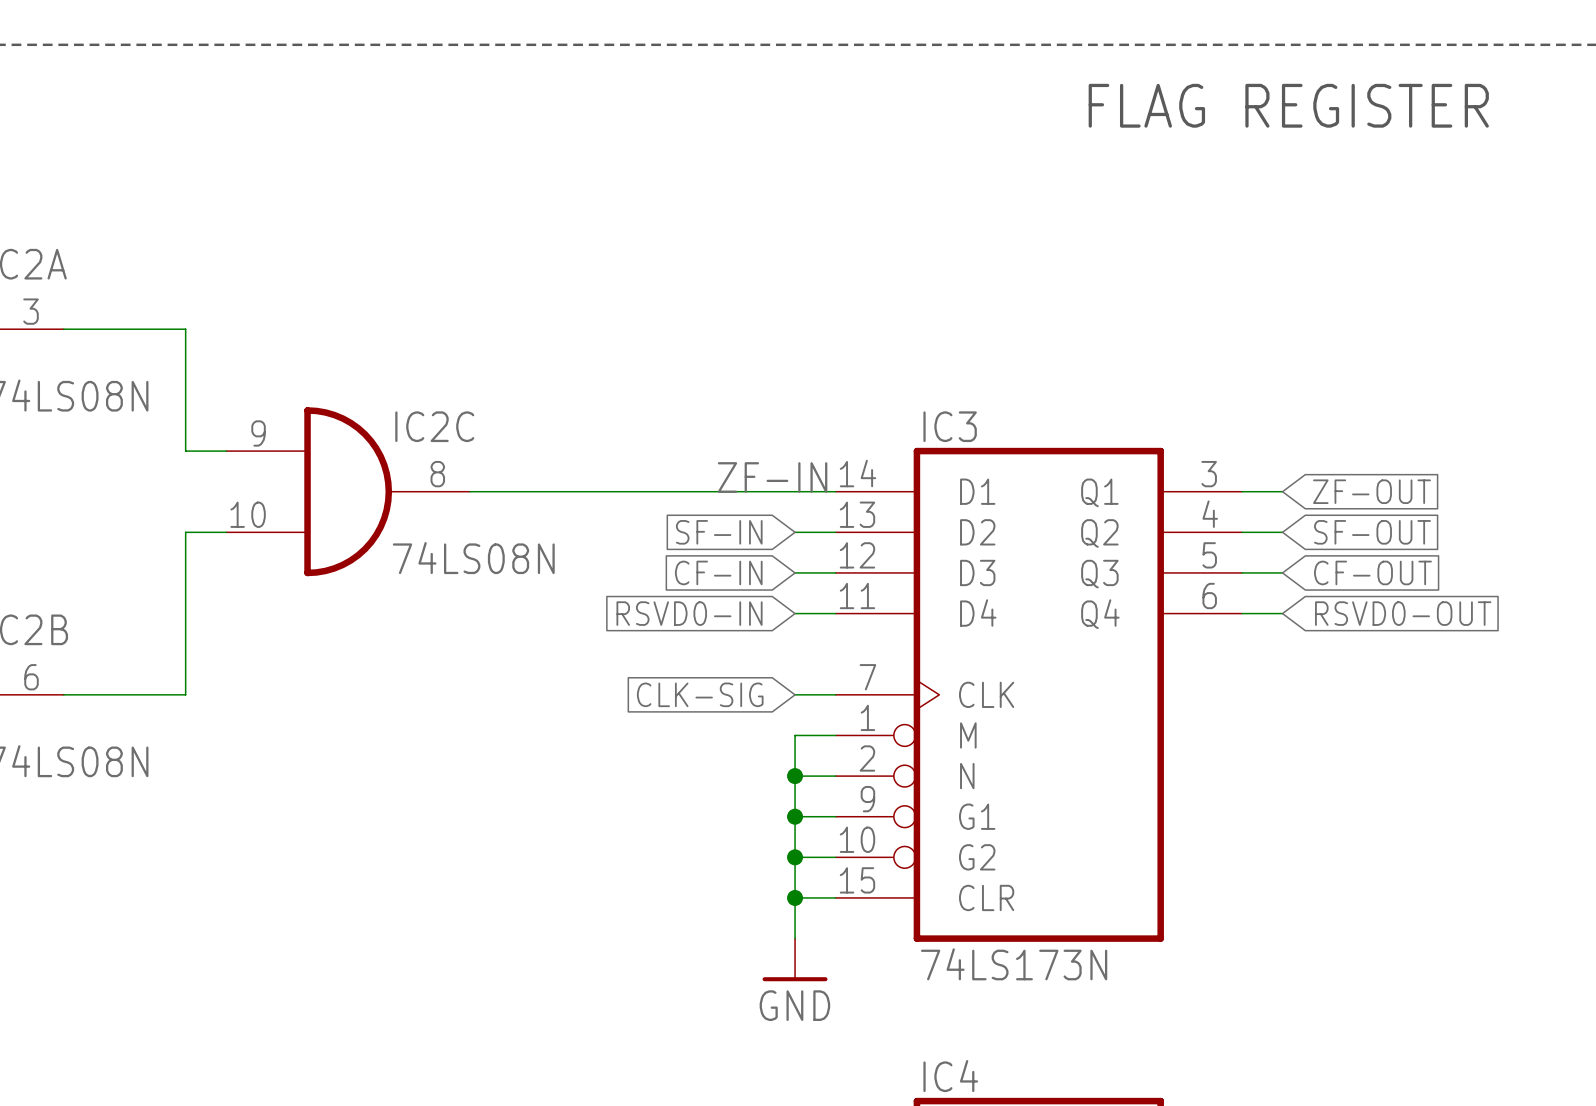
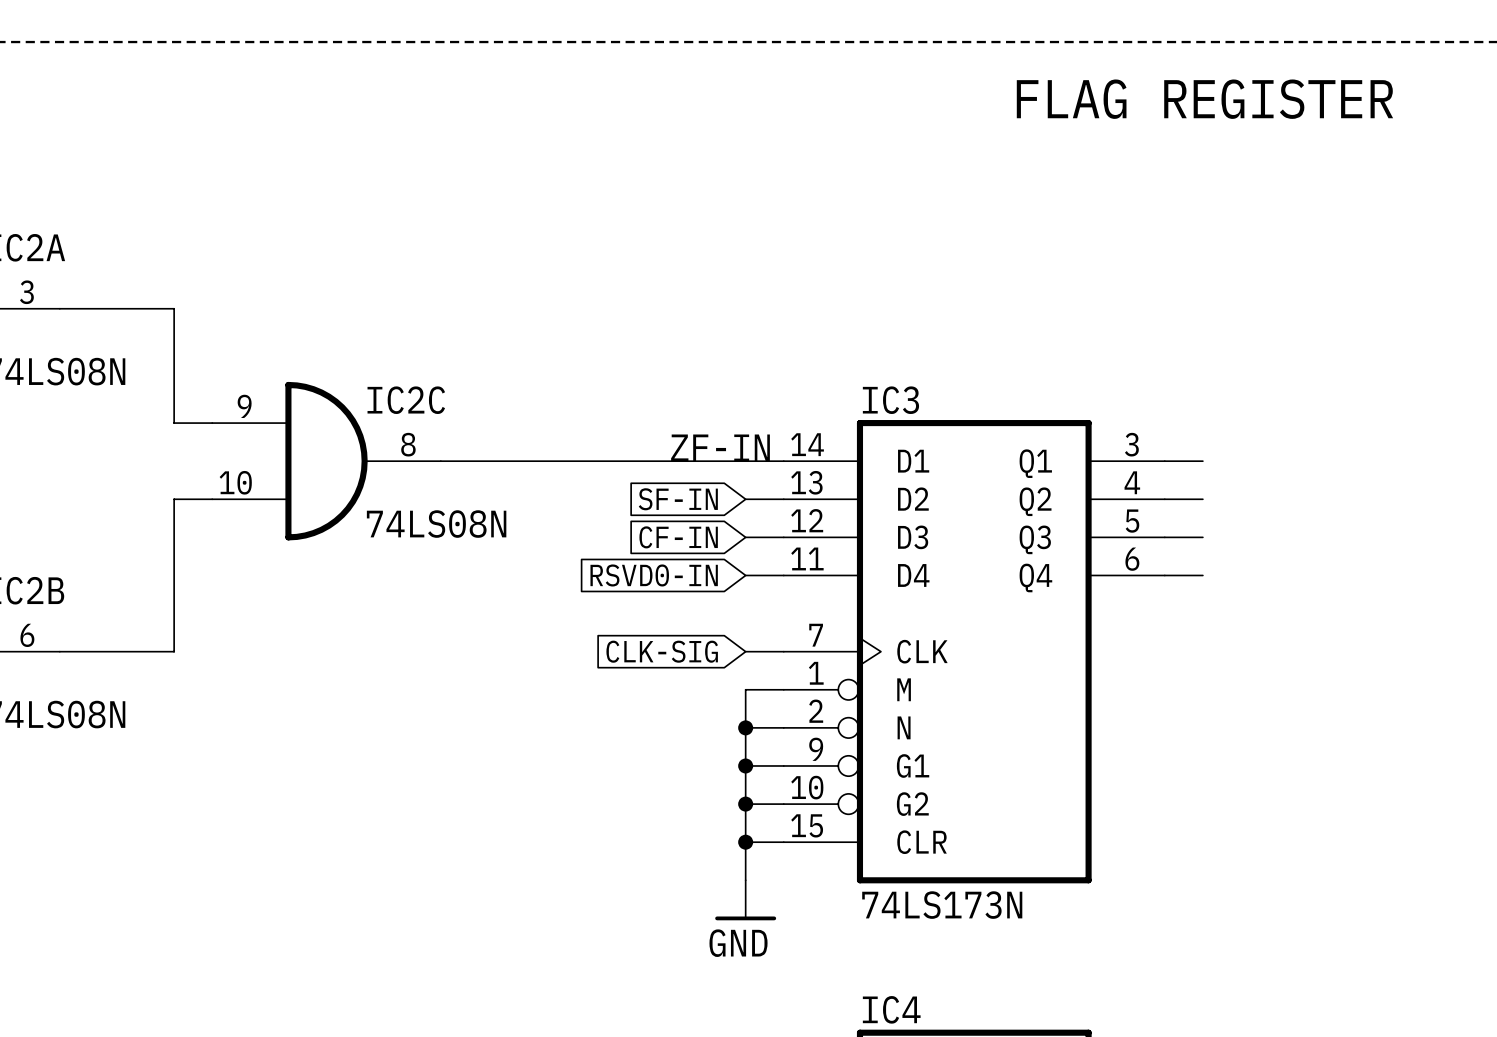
global label: ZF-OUT (1372, 491) -> none
global label: SF-OUT (1372, 532) -> none
global label: CF-OUT (1372, 572) -> none
global label: RSVD0-OUT (1403, 613) -> none

